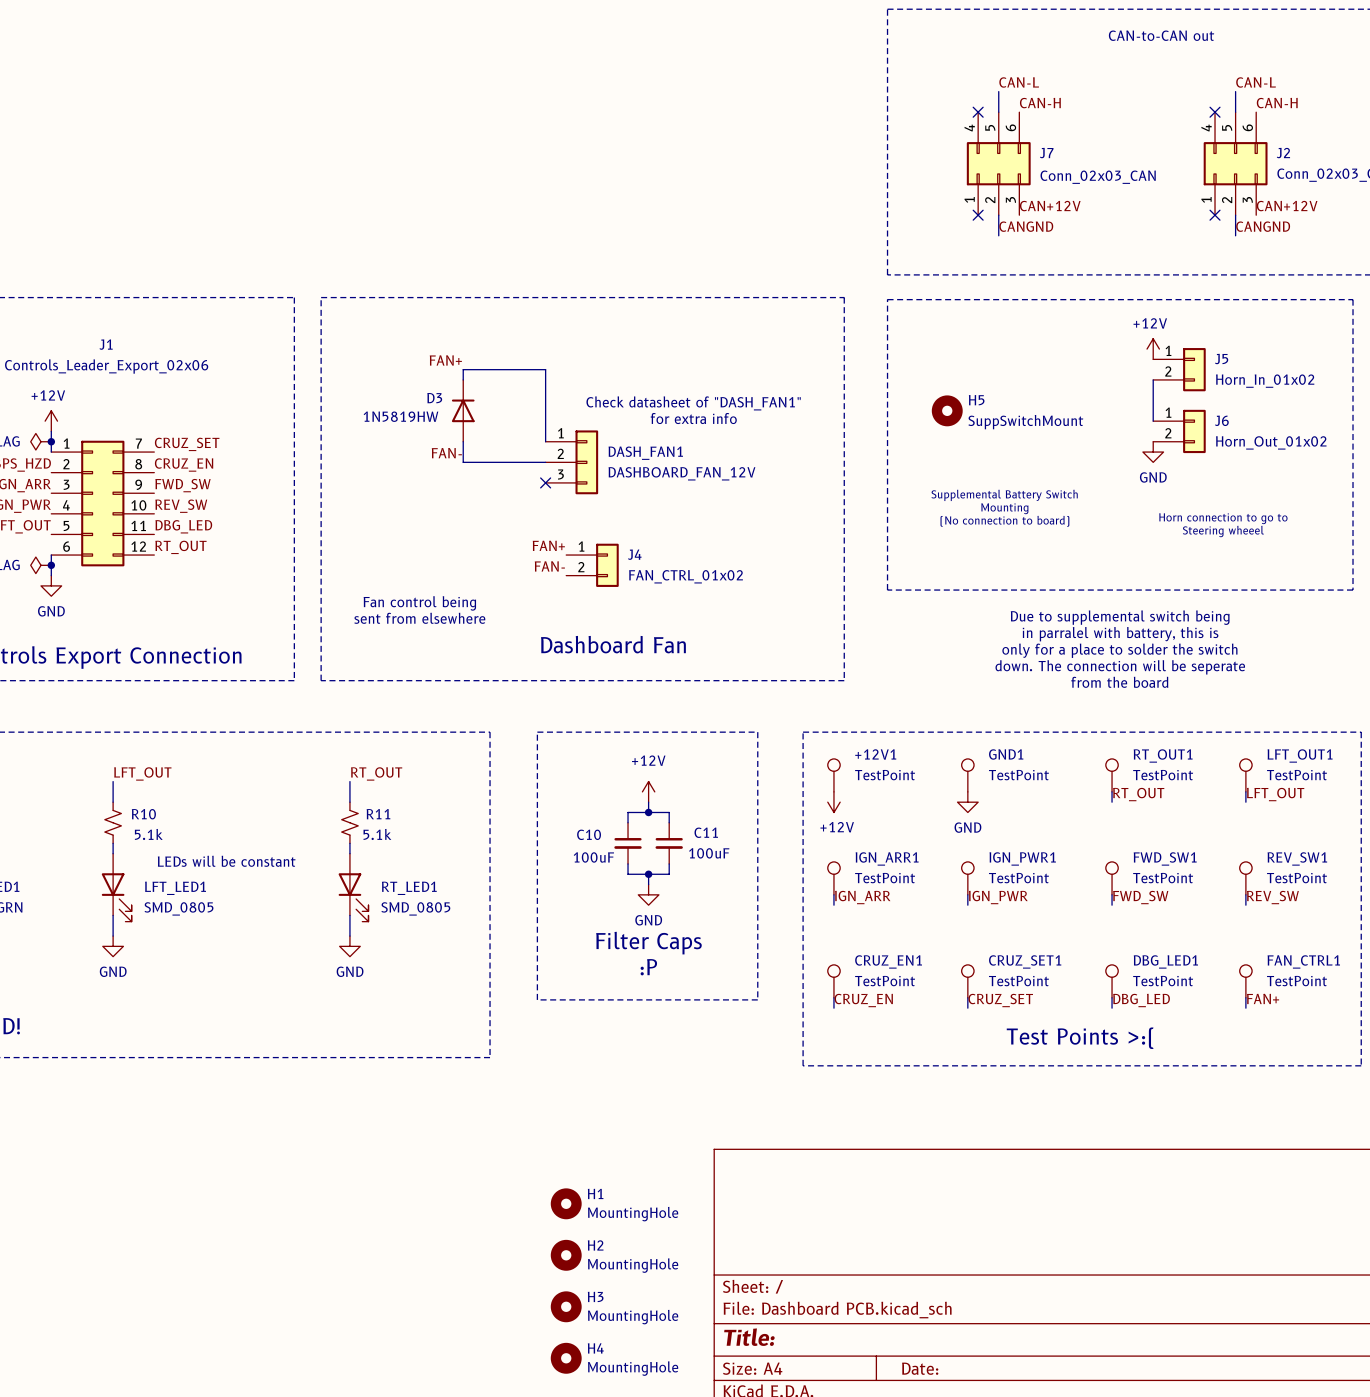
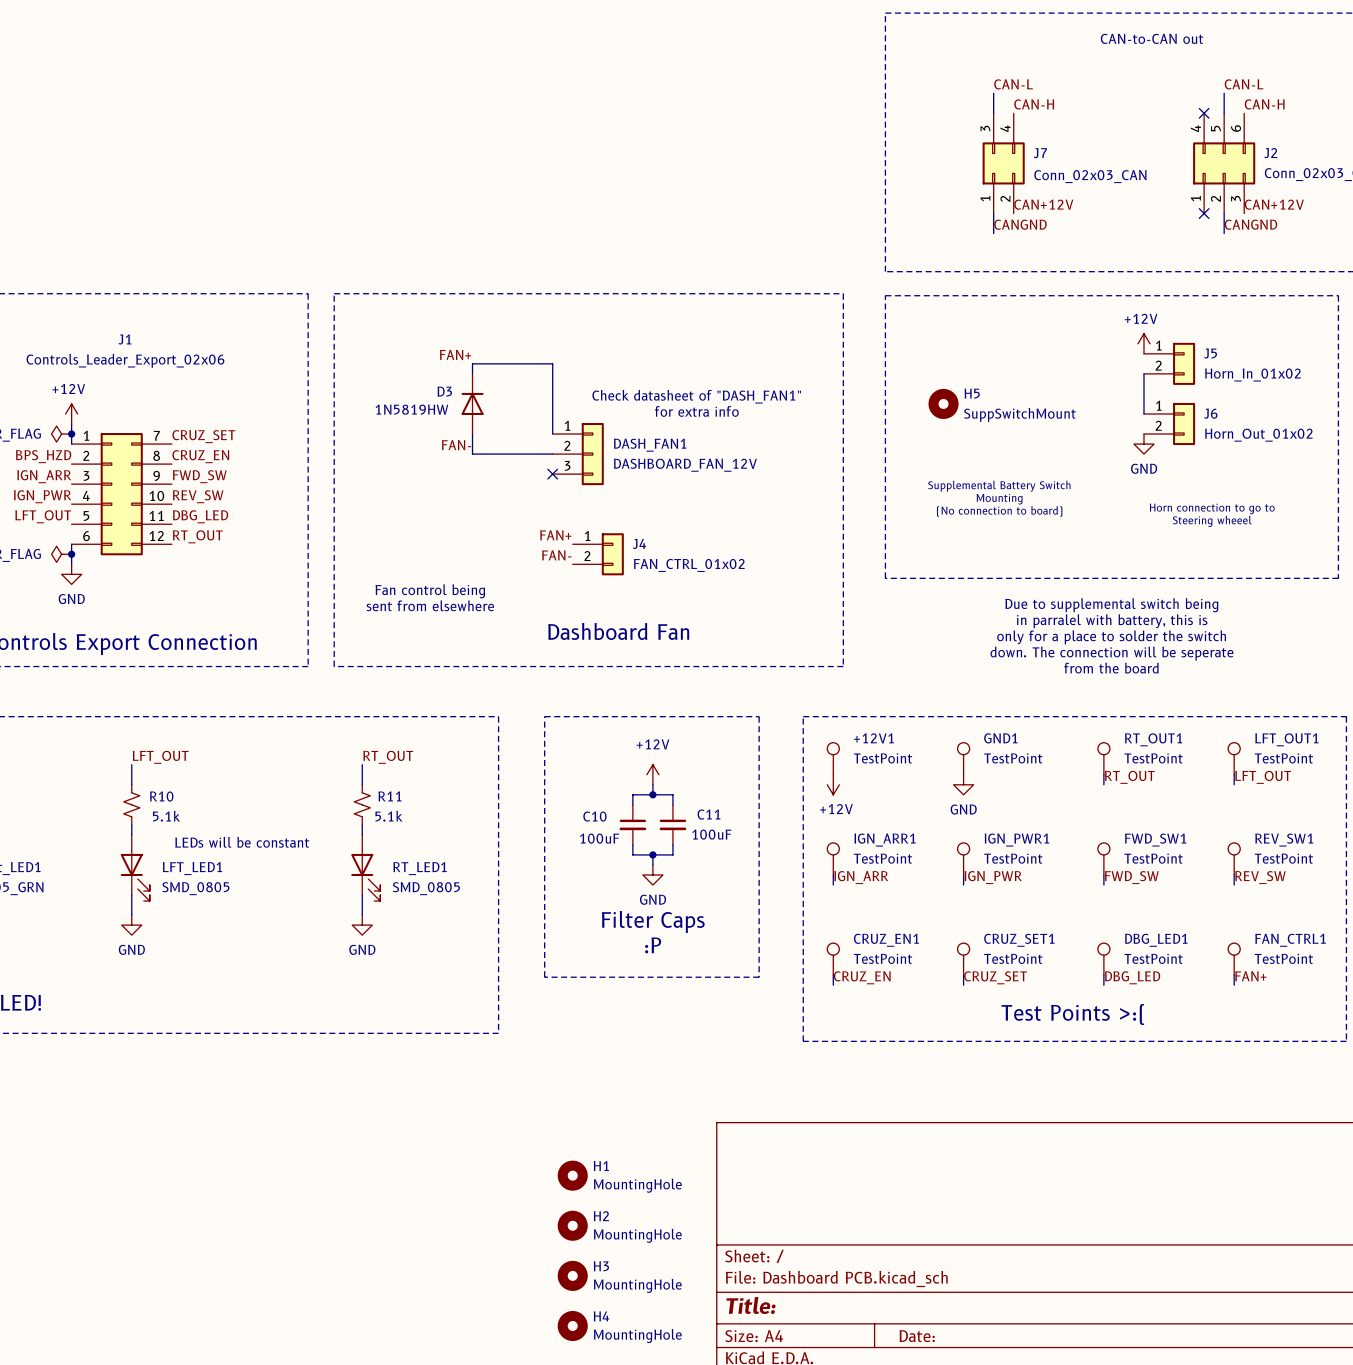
J7 symbol: [966, 112, 1031, 216] -> [982, 113, 1025, 214]
no-connect mark: (978, 112) -> none
no-connect mark: (978, 215) -> none

